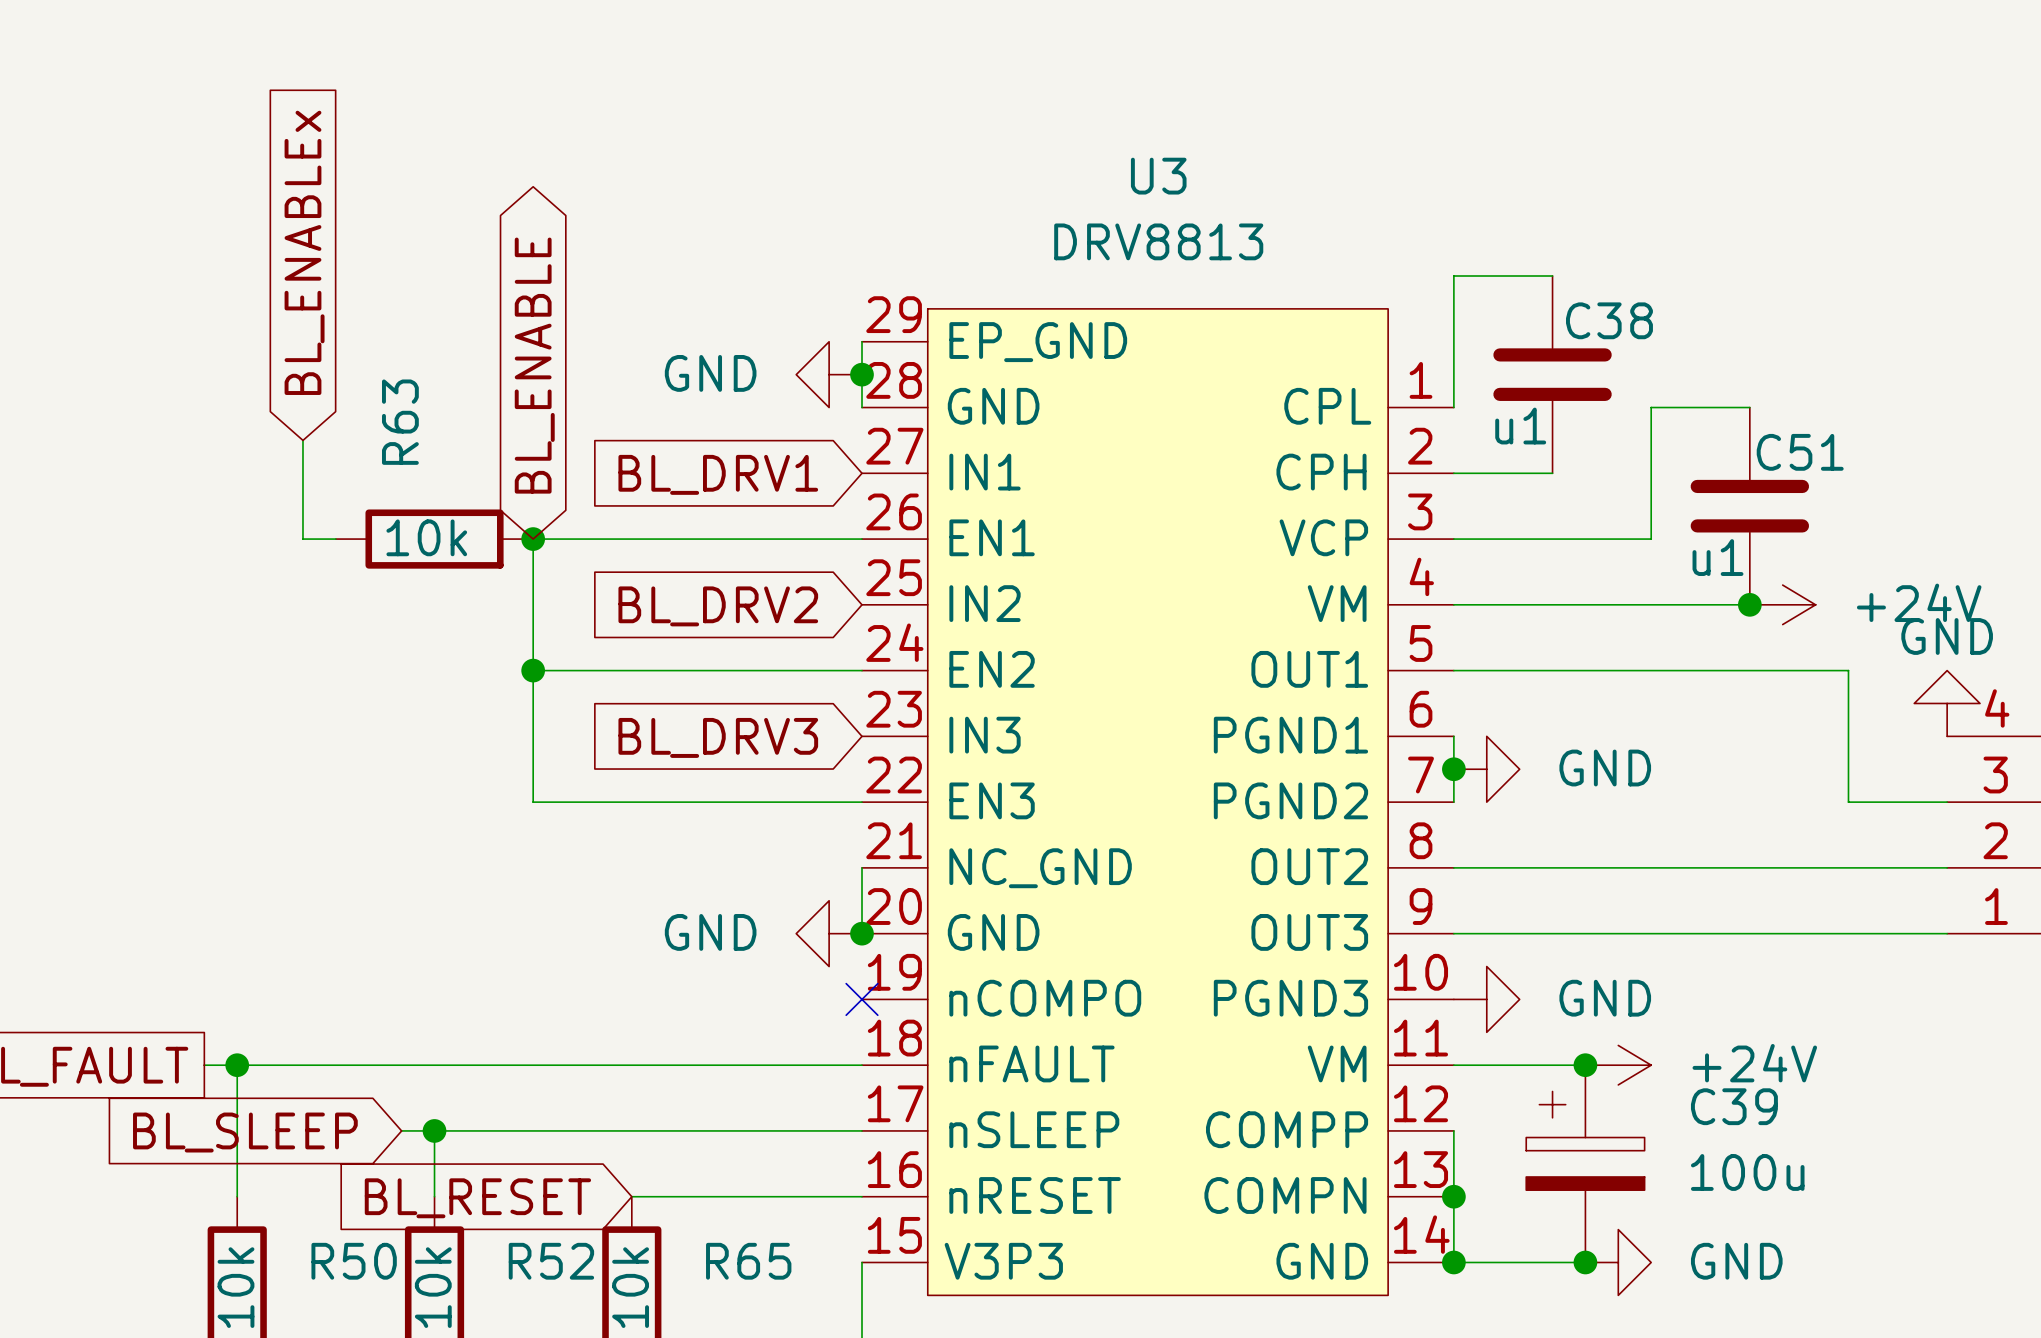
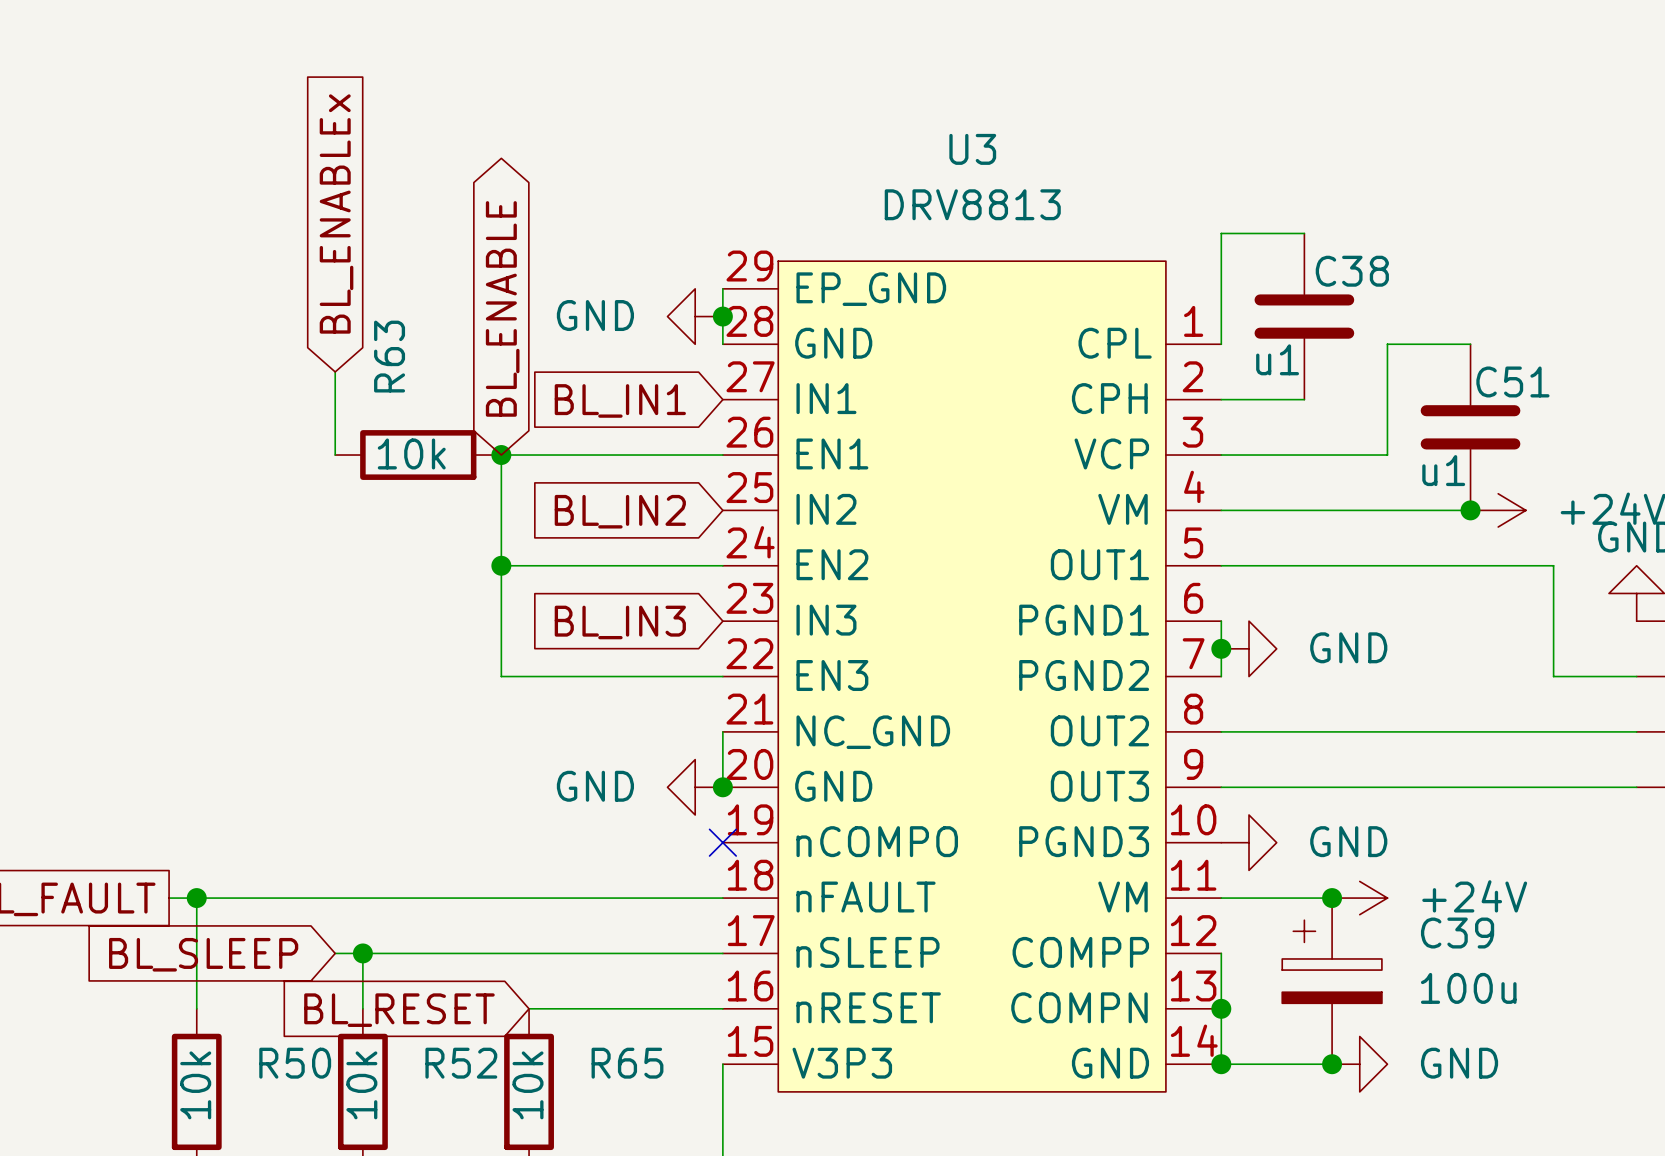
global label position: BL_ENABLEx (304, 252) -> BL_ENABLEx (336, 213)
global label position: BL_ENABLE (534, 365) -> BL_ENABLE (502, 308)
wire: (302, 440) (302, 539) (335, 539) -> none
wire: none -> (335, 371) (335, 455)
global label: BL_DRV1 (718, 474) -> BL_IN1 (620, 400)
R63 position: (434, 539) -> (418, 455)
junction position: (533, 539) -> (501, 455)
wire: (598, 539) (533, 539) (533, 802) (598, 802) -> (501, 455) (501, 676)
global label: BL_DRV2 (718, 606) -> BL_IN2 (620, 511)
wire: (533, 670) (598, 670) -> none
junction position: (533, 670) -> (501, 565)
global label: BL_DRV3 (718, 737) -> BL_IN3 (620, 622)

